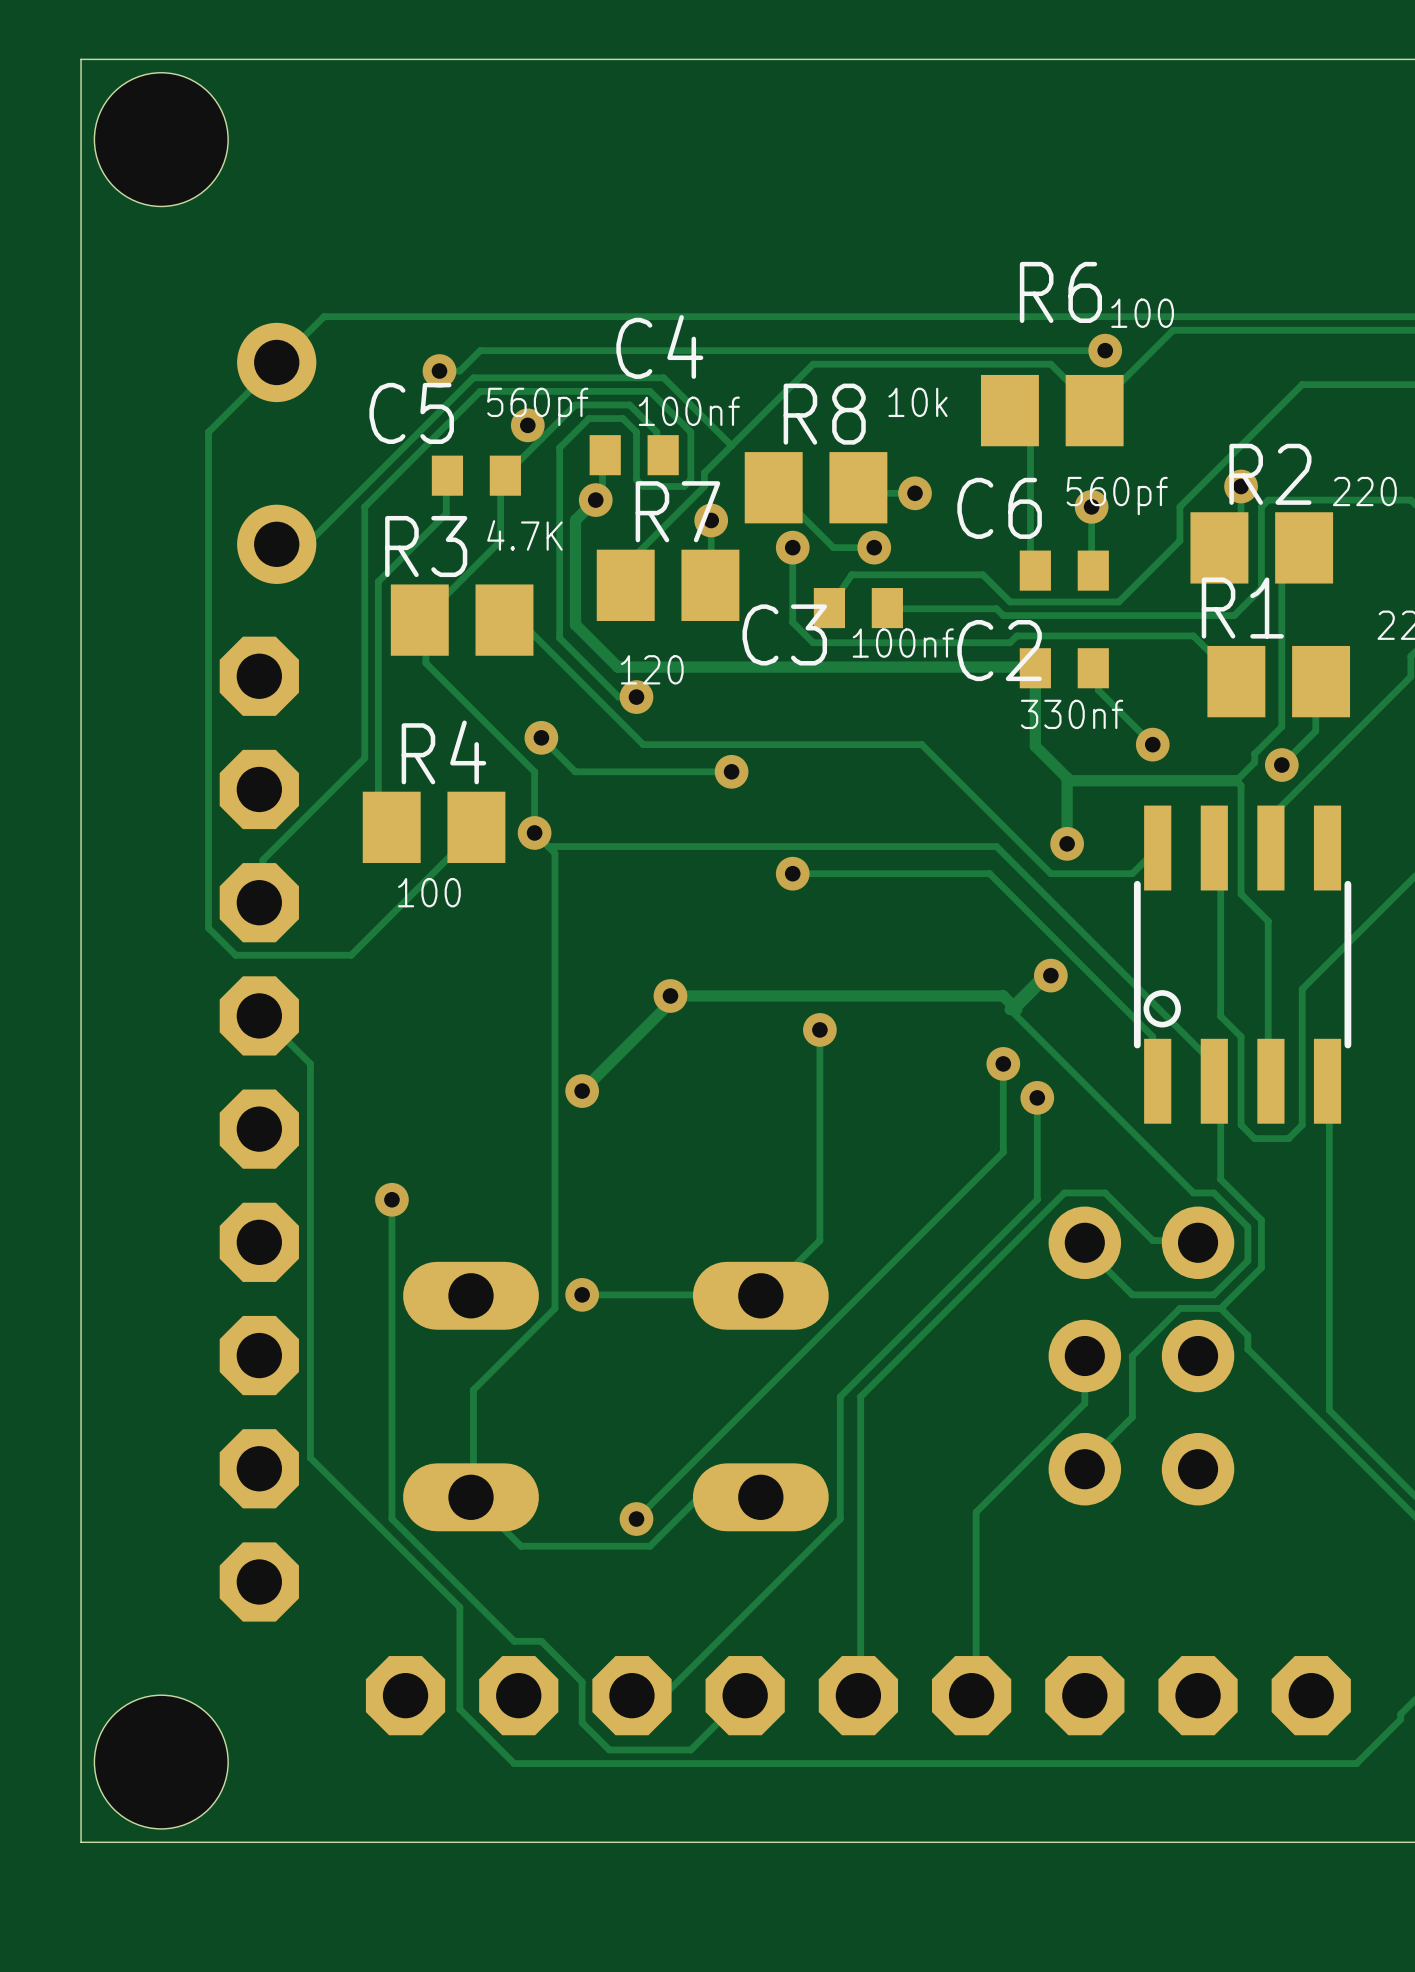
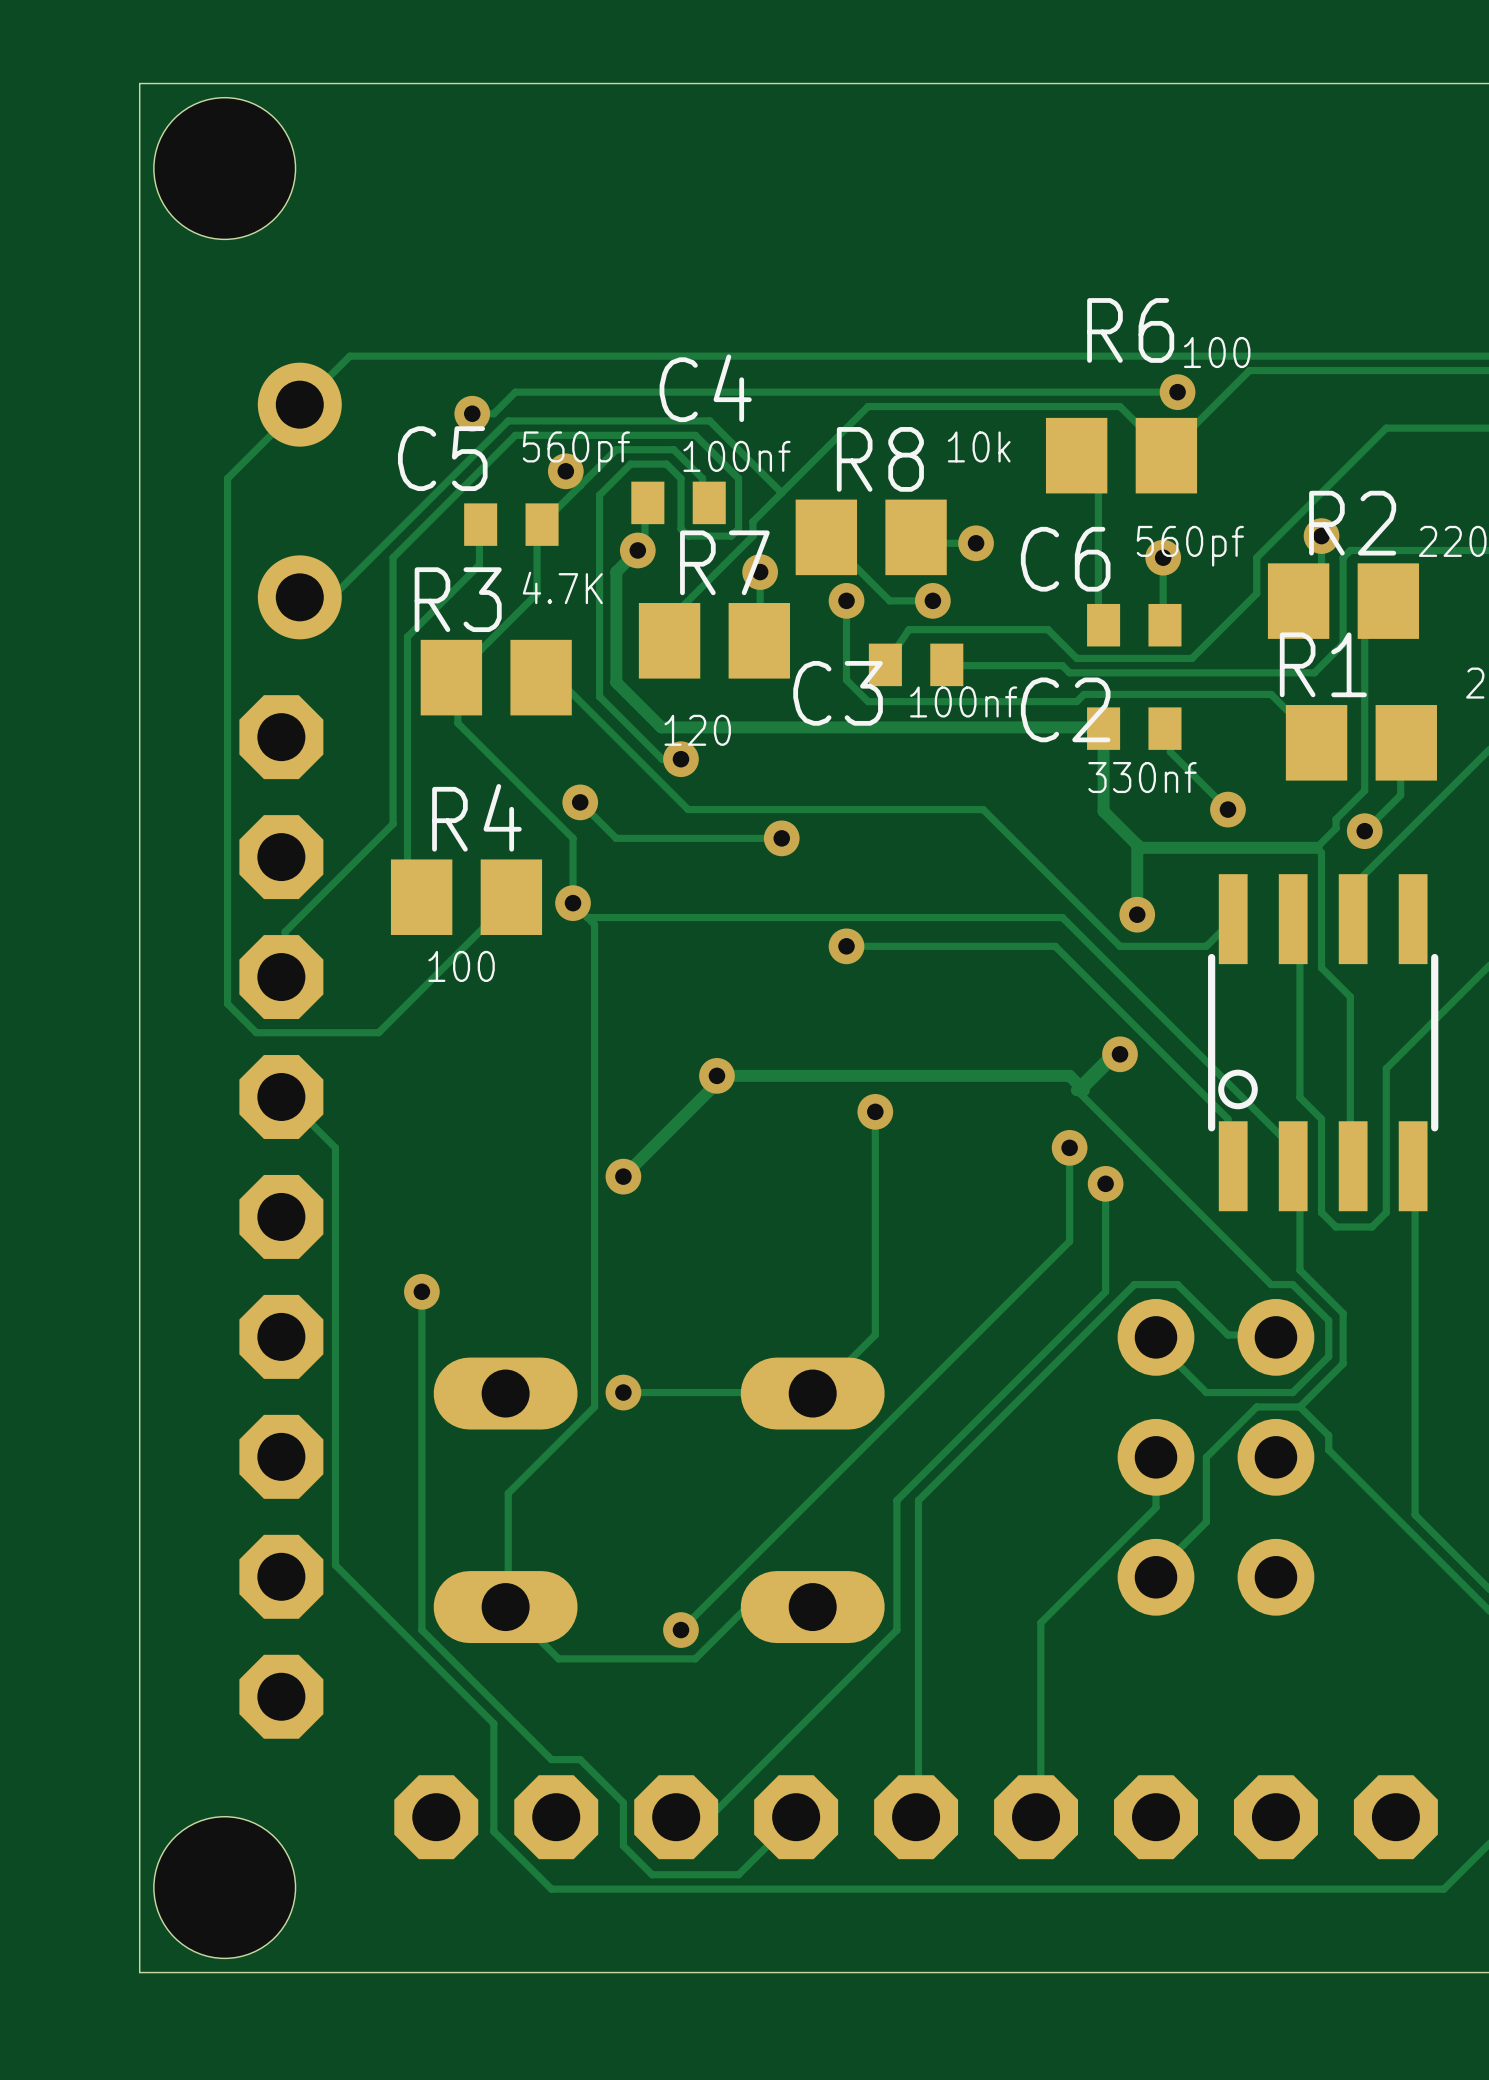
board edge: (125, 59) (81, 59) (81, 1842) (125, 1842) -> (139, 83) (139, 1972)
hole position: (161, 139) -> (224, 168)
hole position: (161, 1762) -> (224, 1887)

